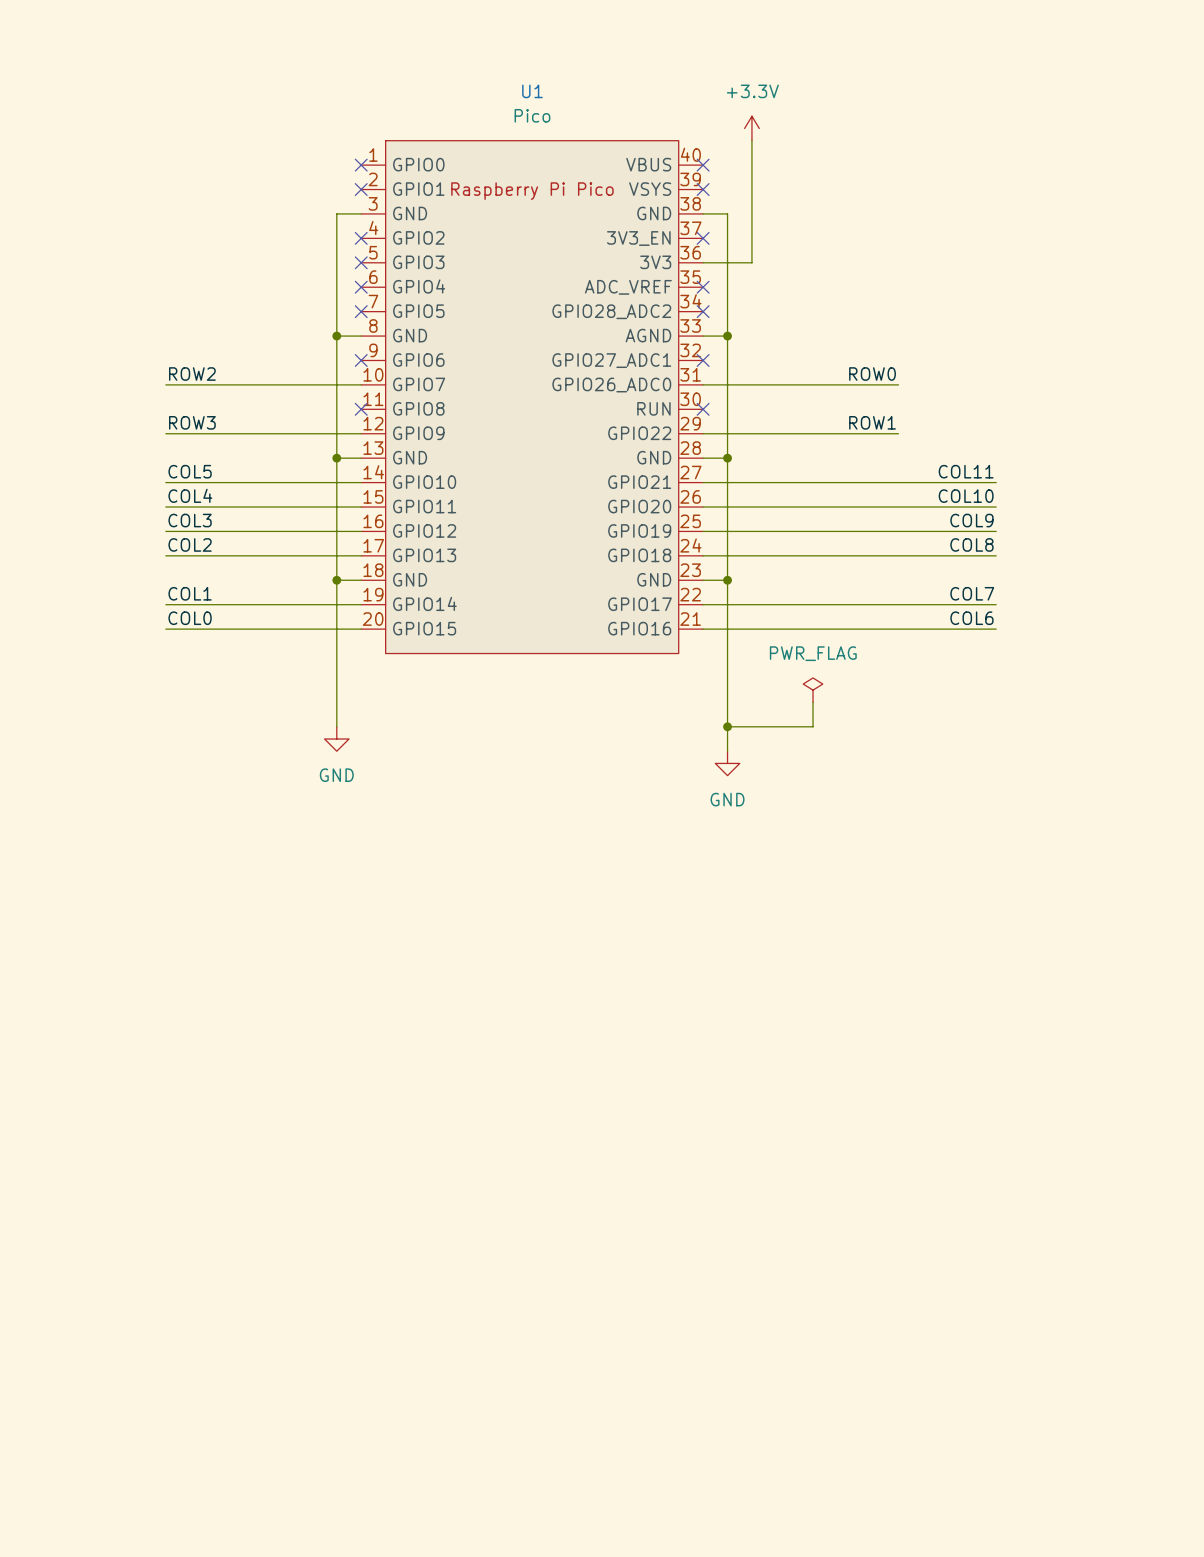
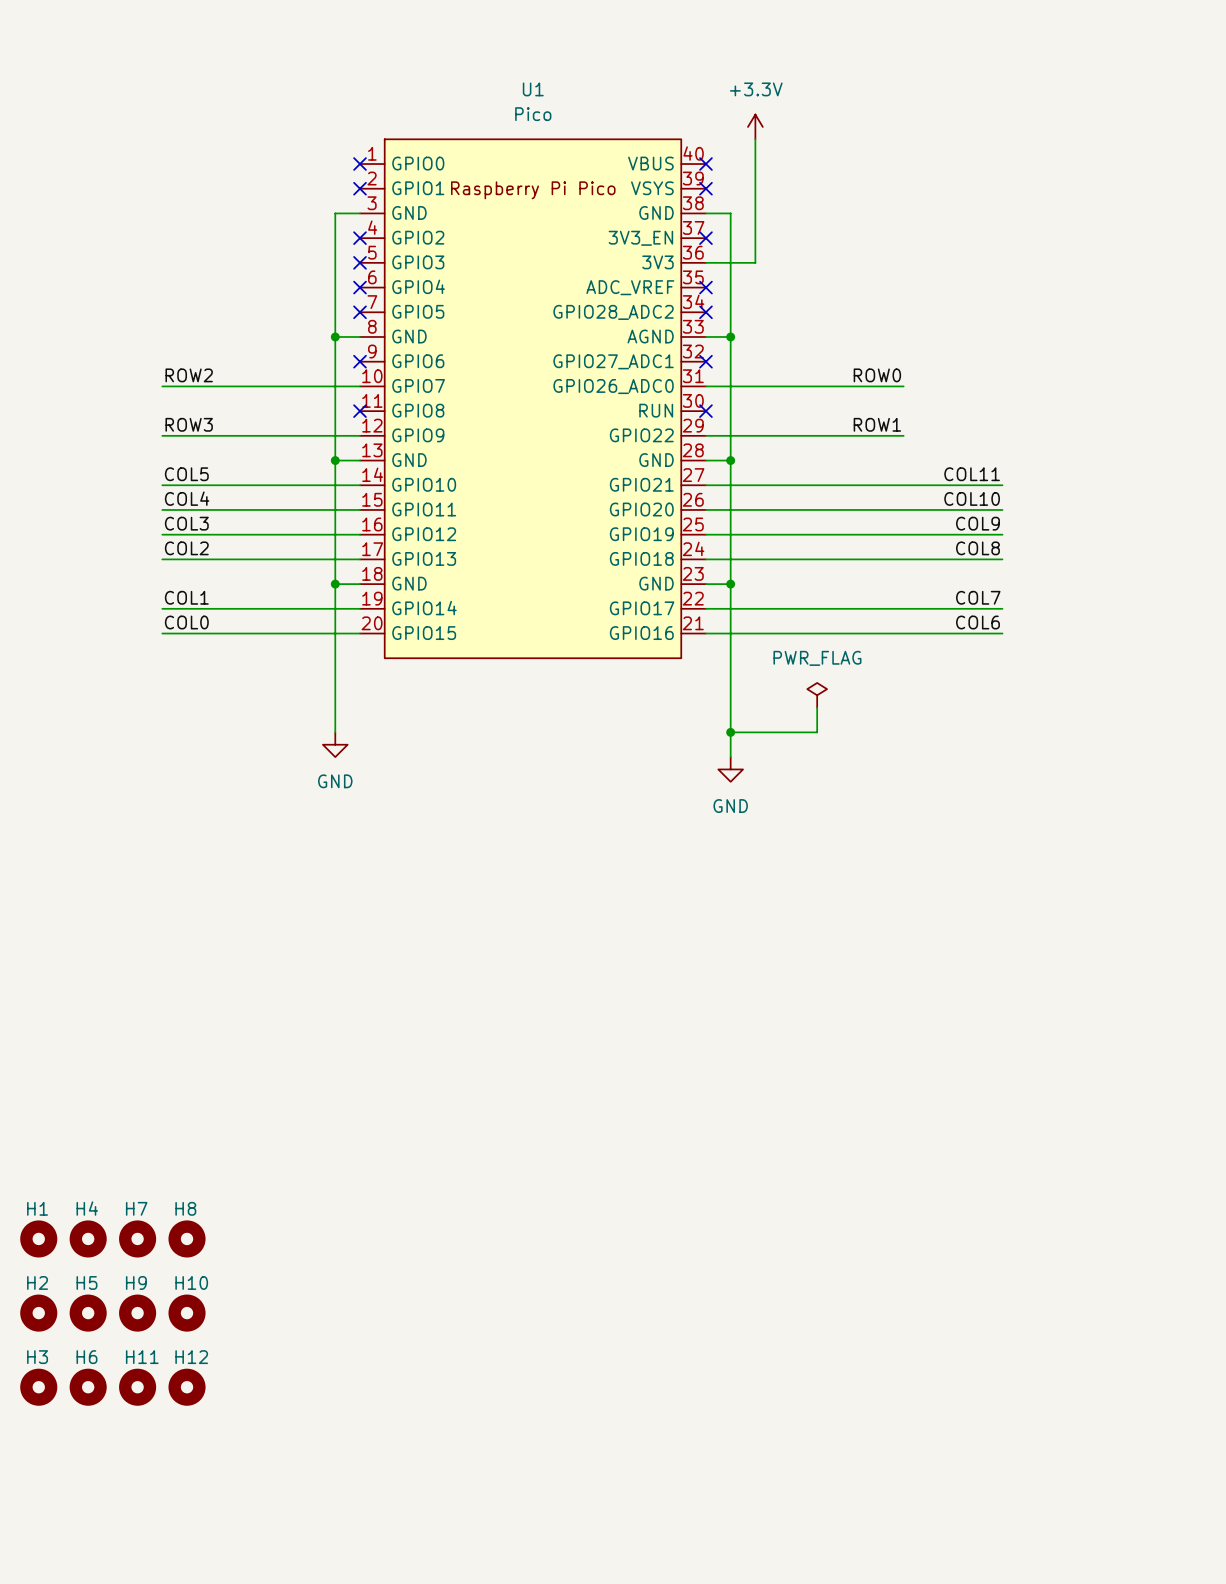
H1: none -> (38, 1238)
H4: none -> (88, 1238)
H7: none -> (137, 1238)
H8: none -> (187, 1238)
H2: none -> (38, 1313)
H5: none -> (88, 1313)
H9: none -> (137, 1313)
H10: none -> (187, 1313)
H3: none -> (38, 1387)
H6: none -> (88, 1387)
H11: none -> (137, 1387)
H12: none -> (187, 1387)

